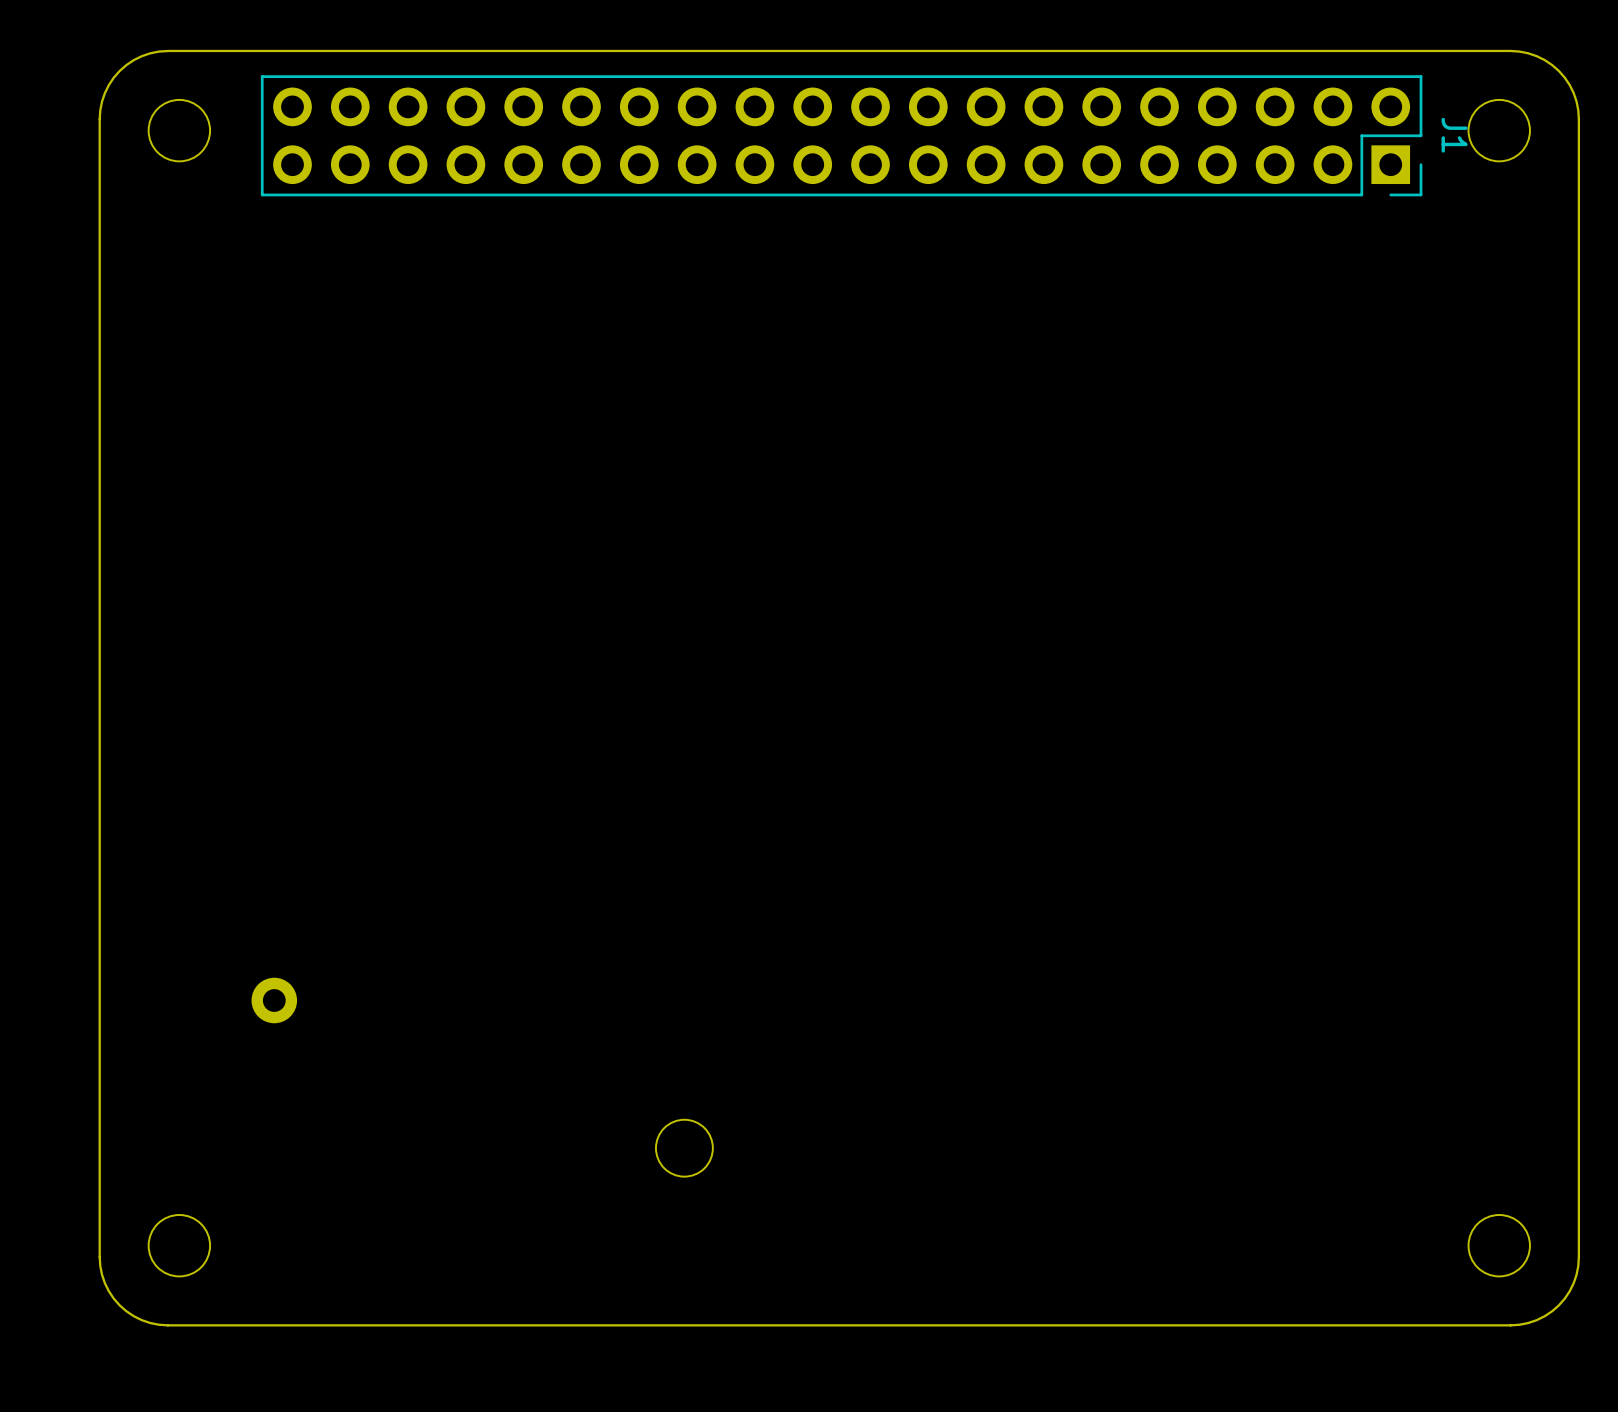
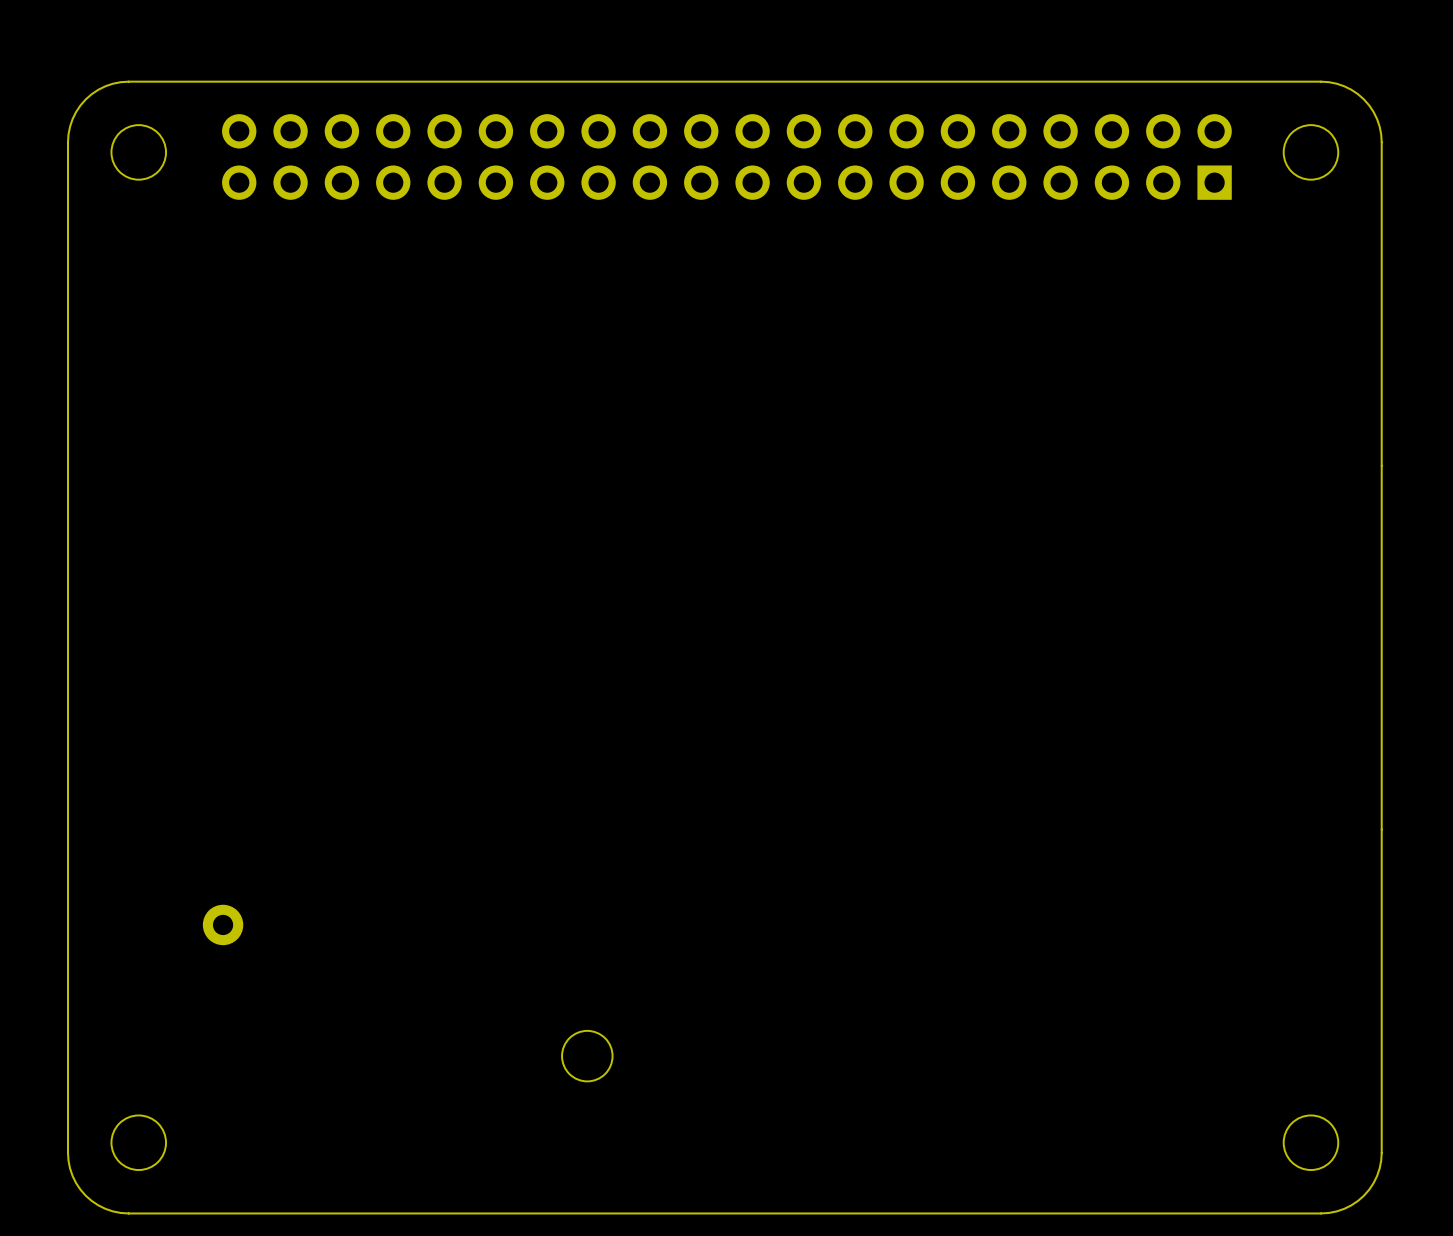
J1: (841, 135) -> none

